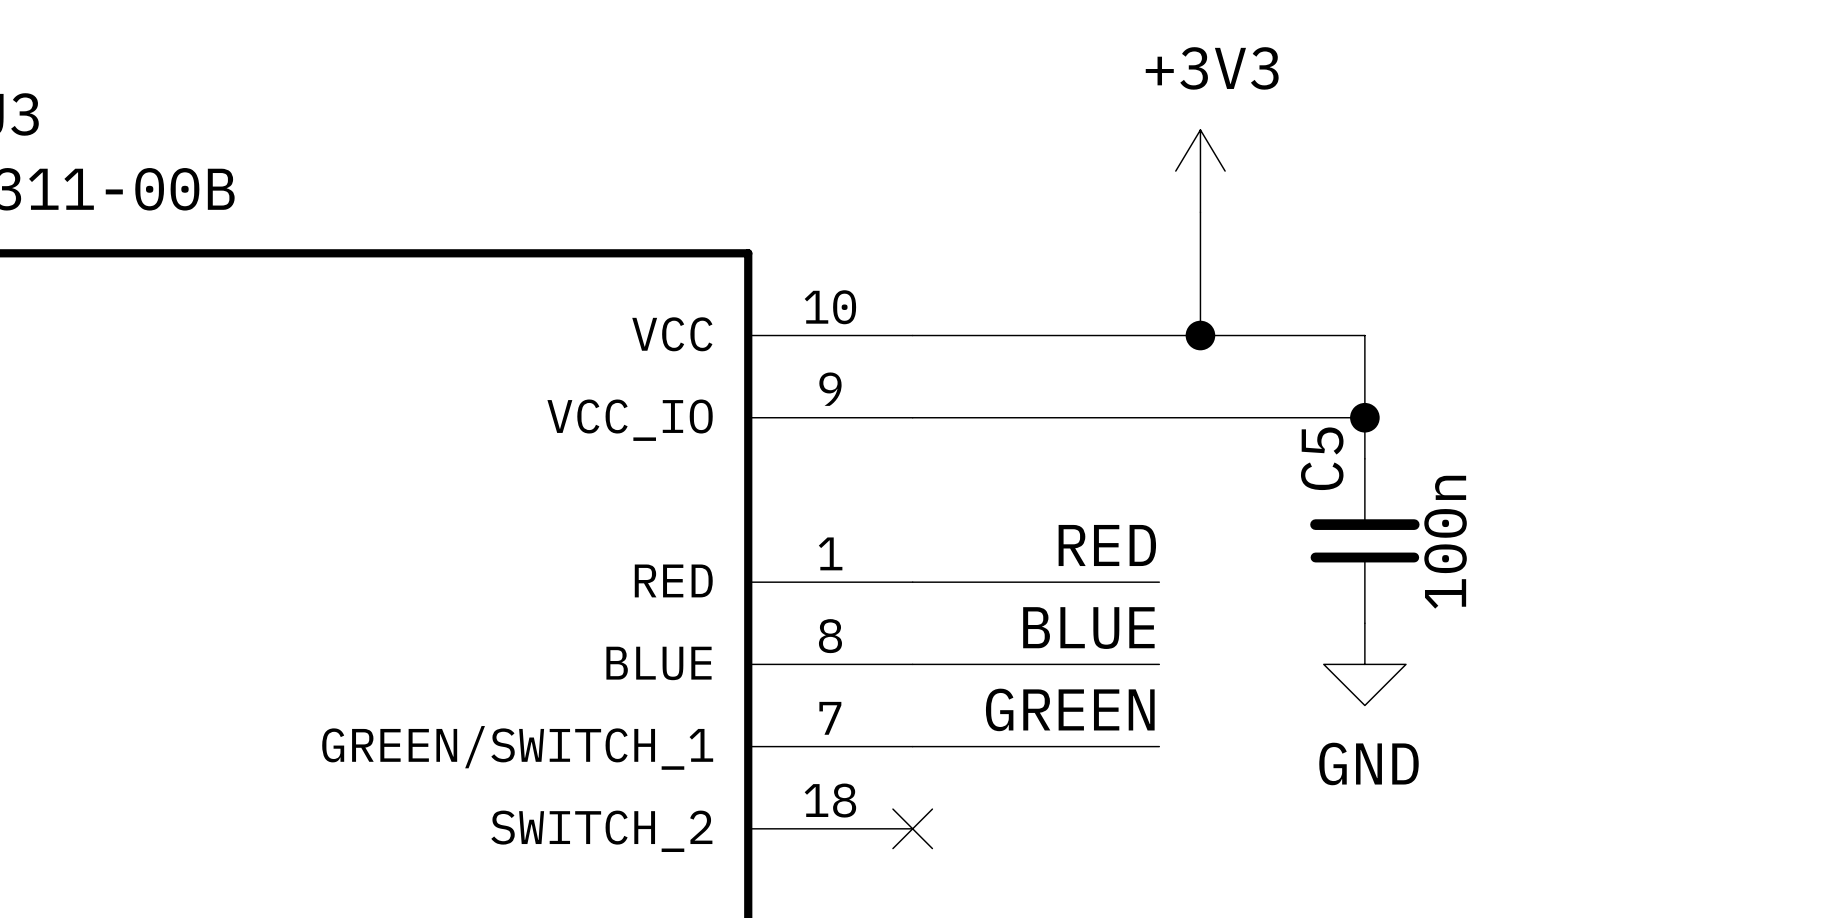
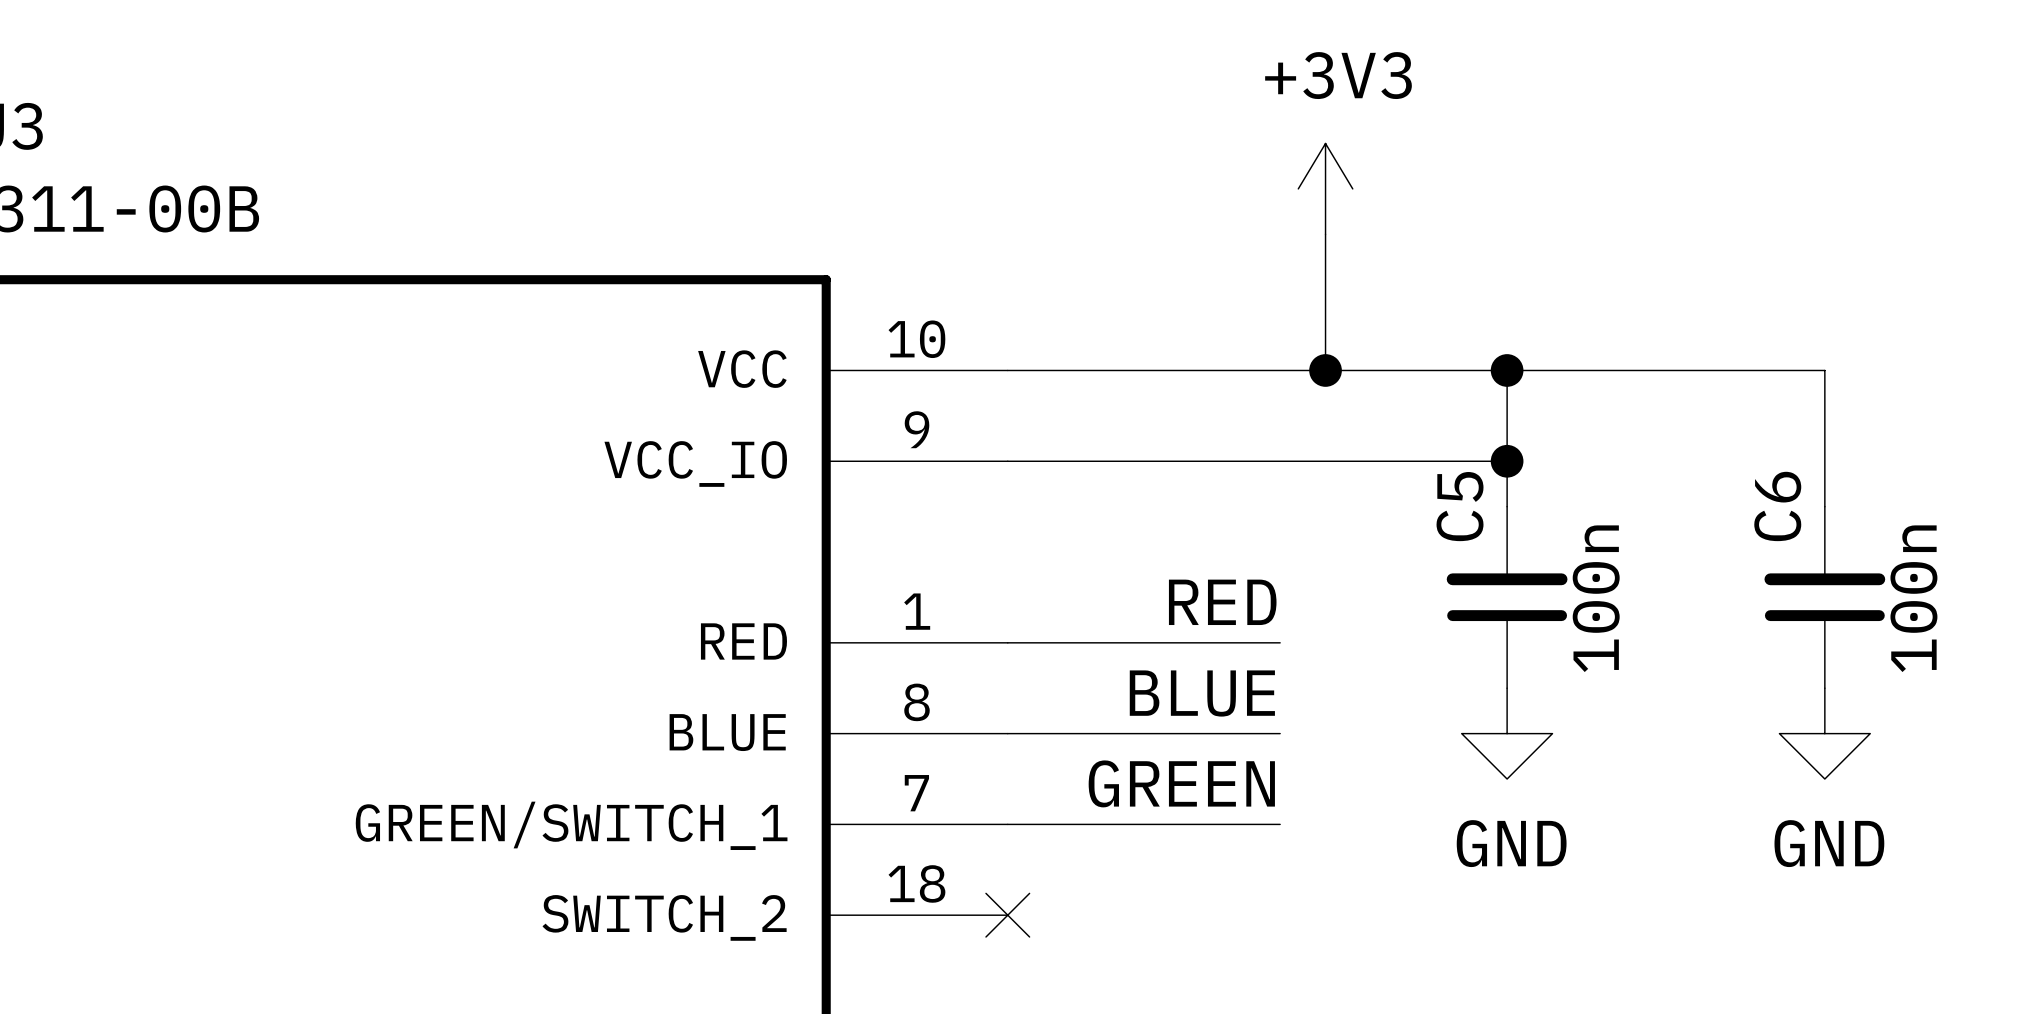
wire: none -> (1507, 370) (1824, 370) (1824, 506)
junction: none -> (1507, 370)
C6: none -> 100n (1824, 597)
power symbol: none -> GND (1824, 733)

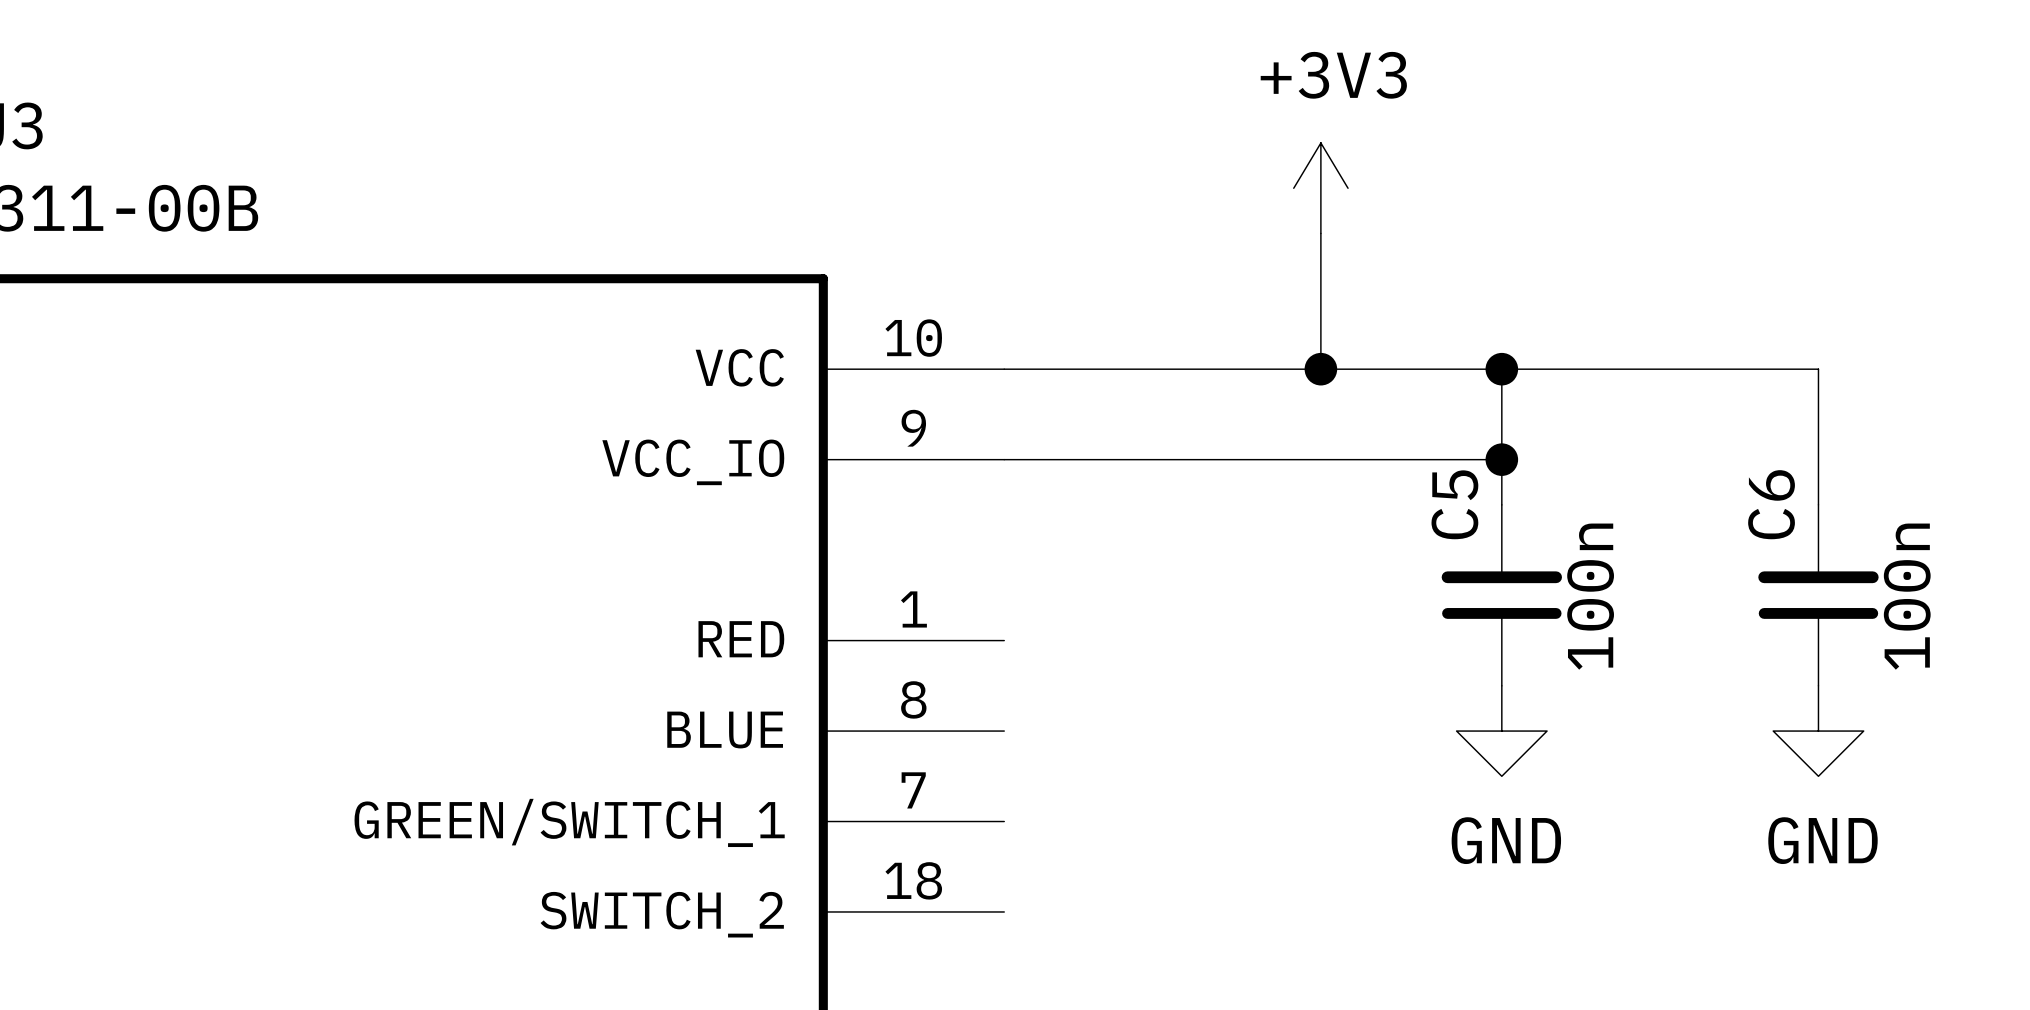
label: RED (1222, 602) -> none
wire: (1007, 642) (1280, 642) -> none
label: BLUE (1202, 693) -> none
wire: (1007, 733) (1280, 733) -> none
label: GREEN (1181, 783) -> none
wire: (1007, 824) (1280, 824) -> none
no-connect mark: (1007, 915) -> none

